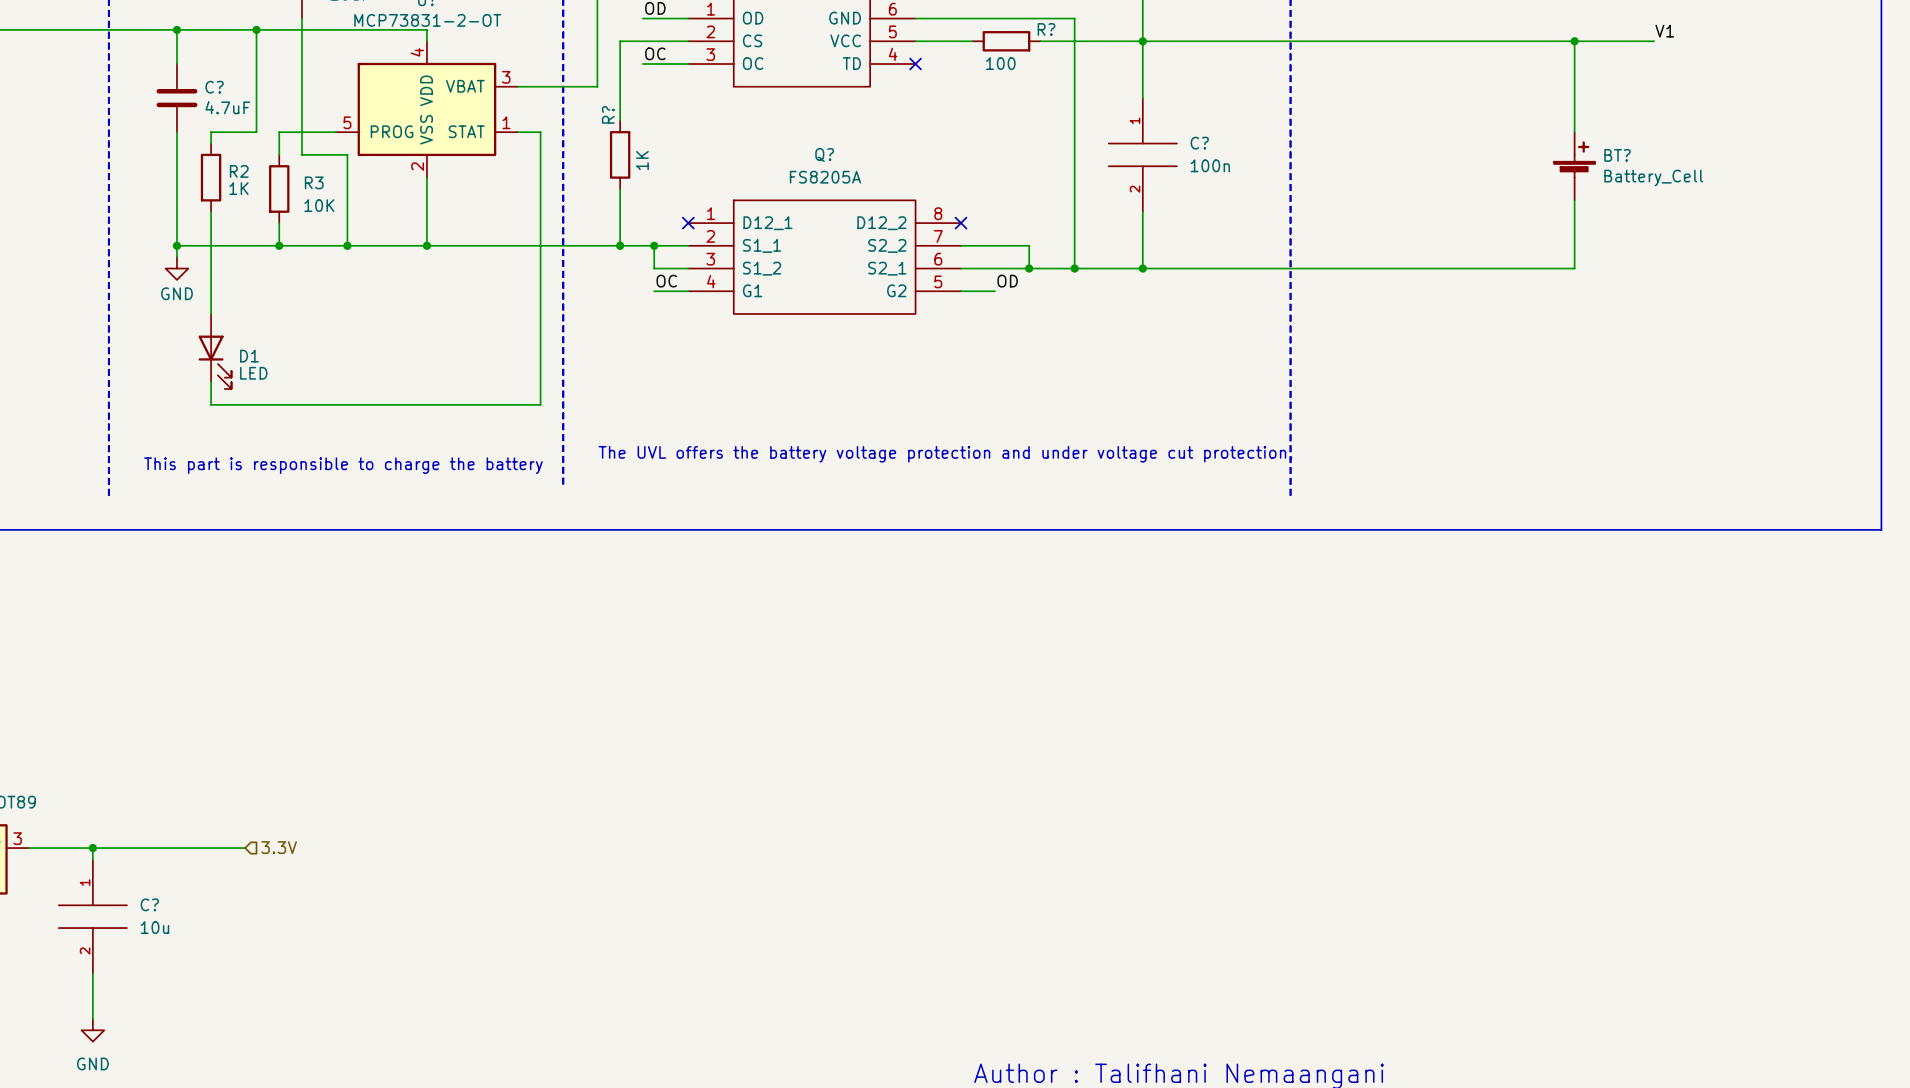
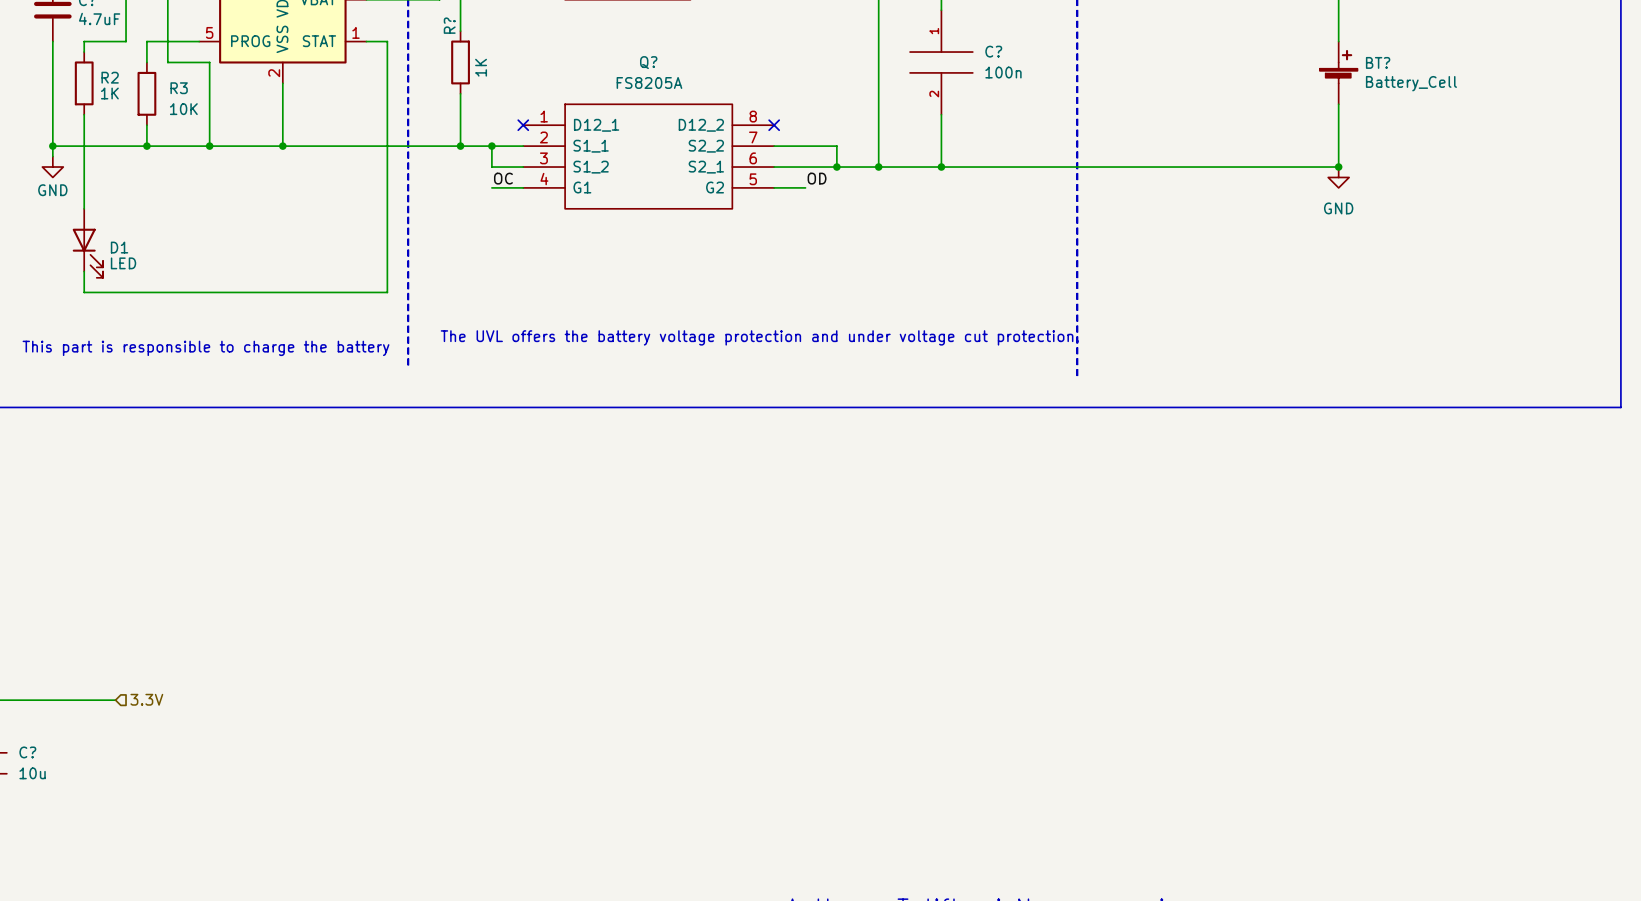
junction: none -> (1338, 167)
power symbol: none -> GND (1338, 177)

